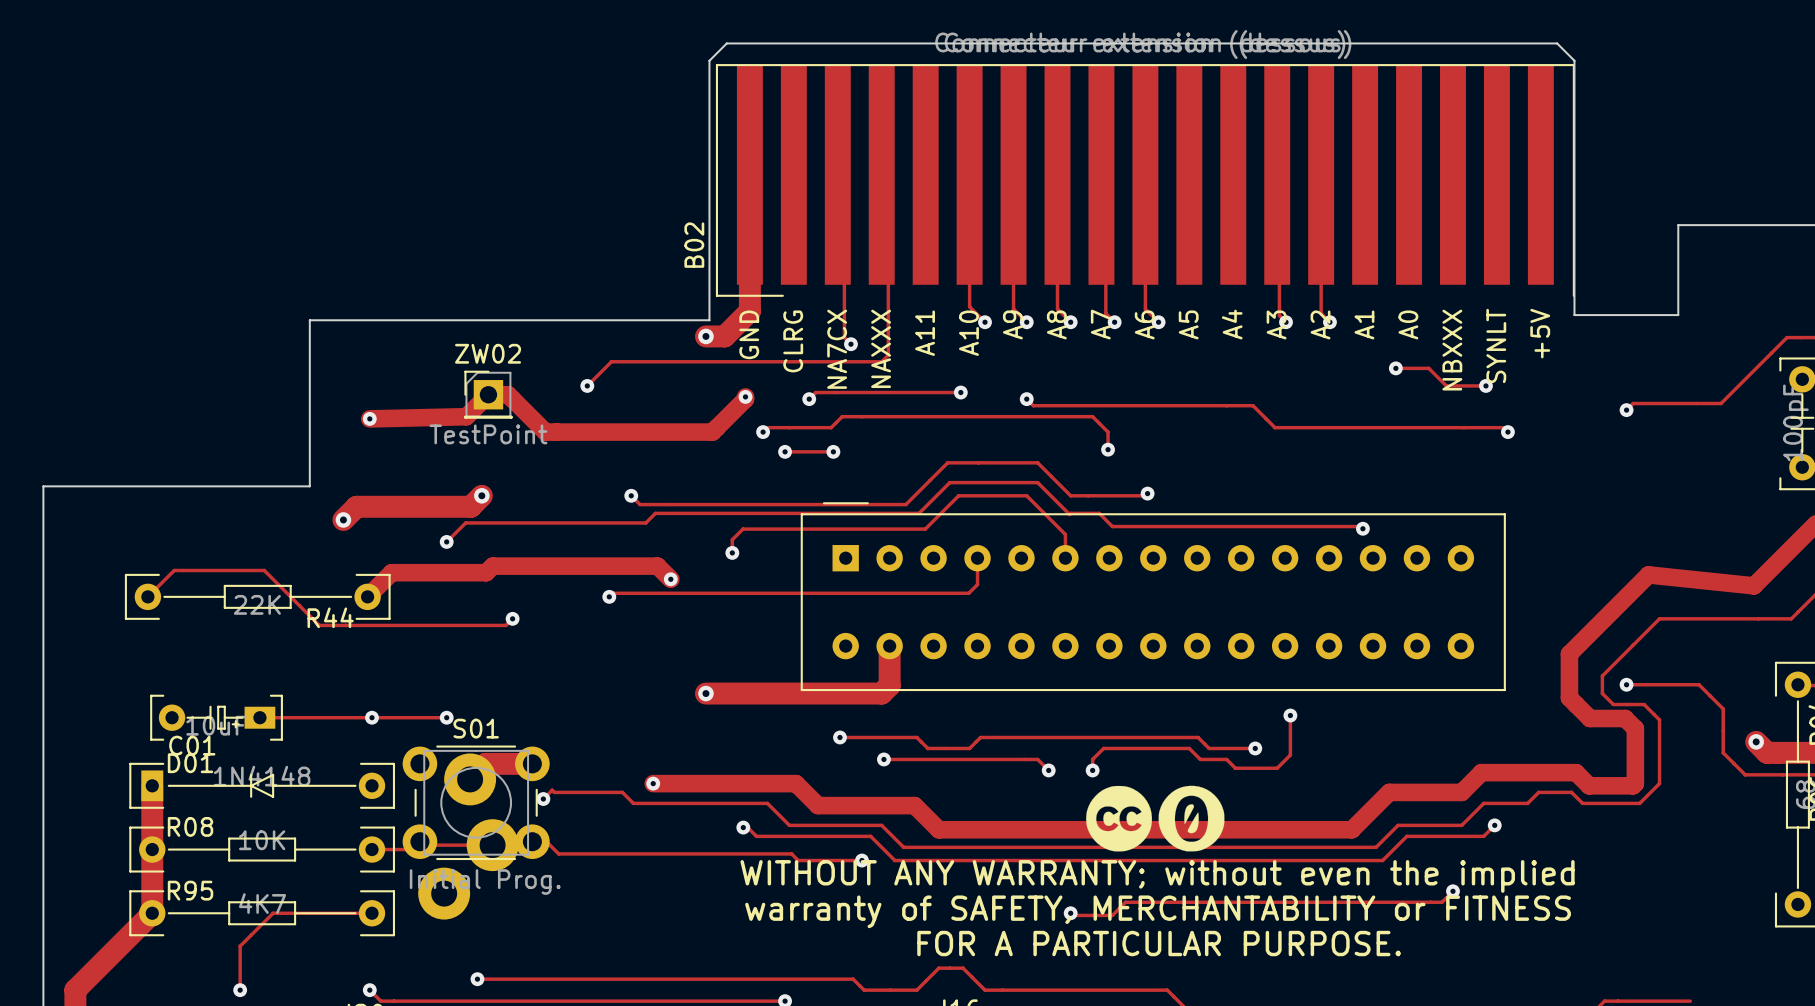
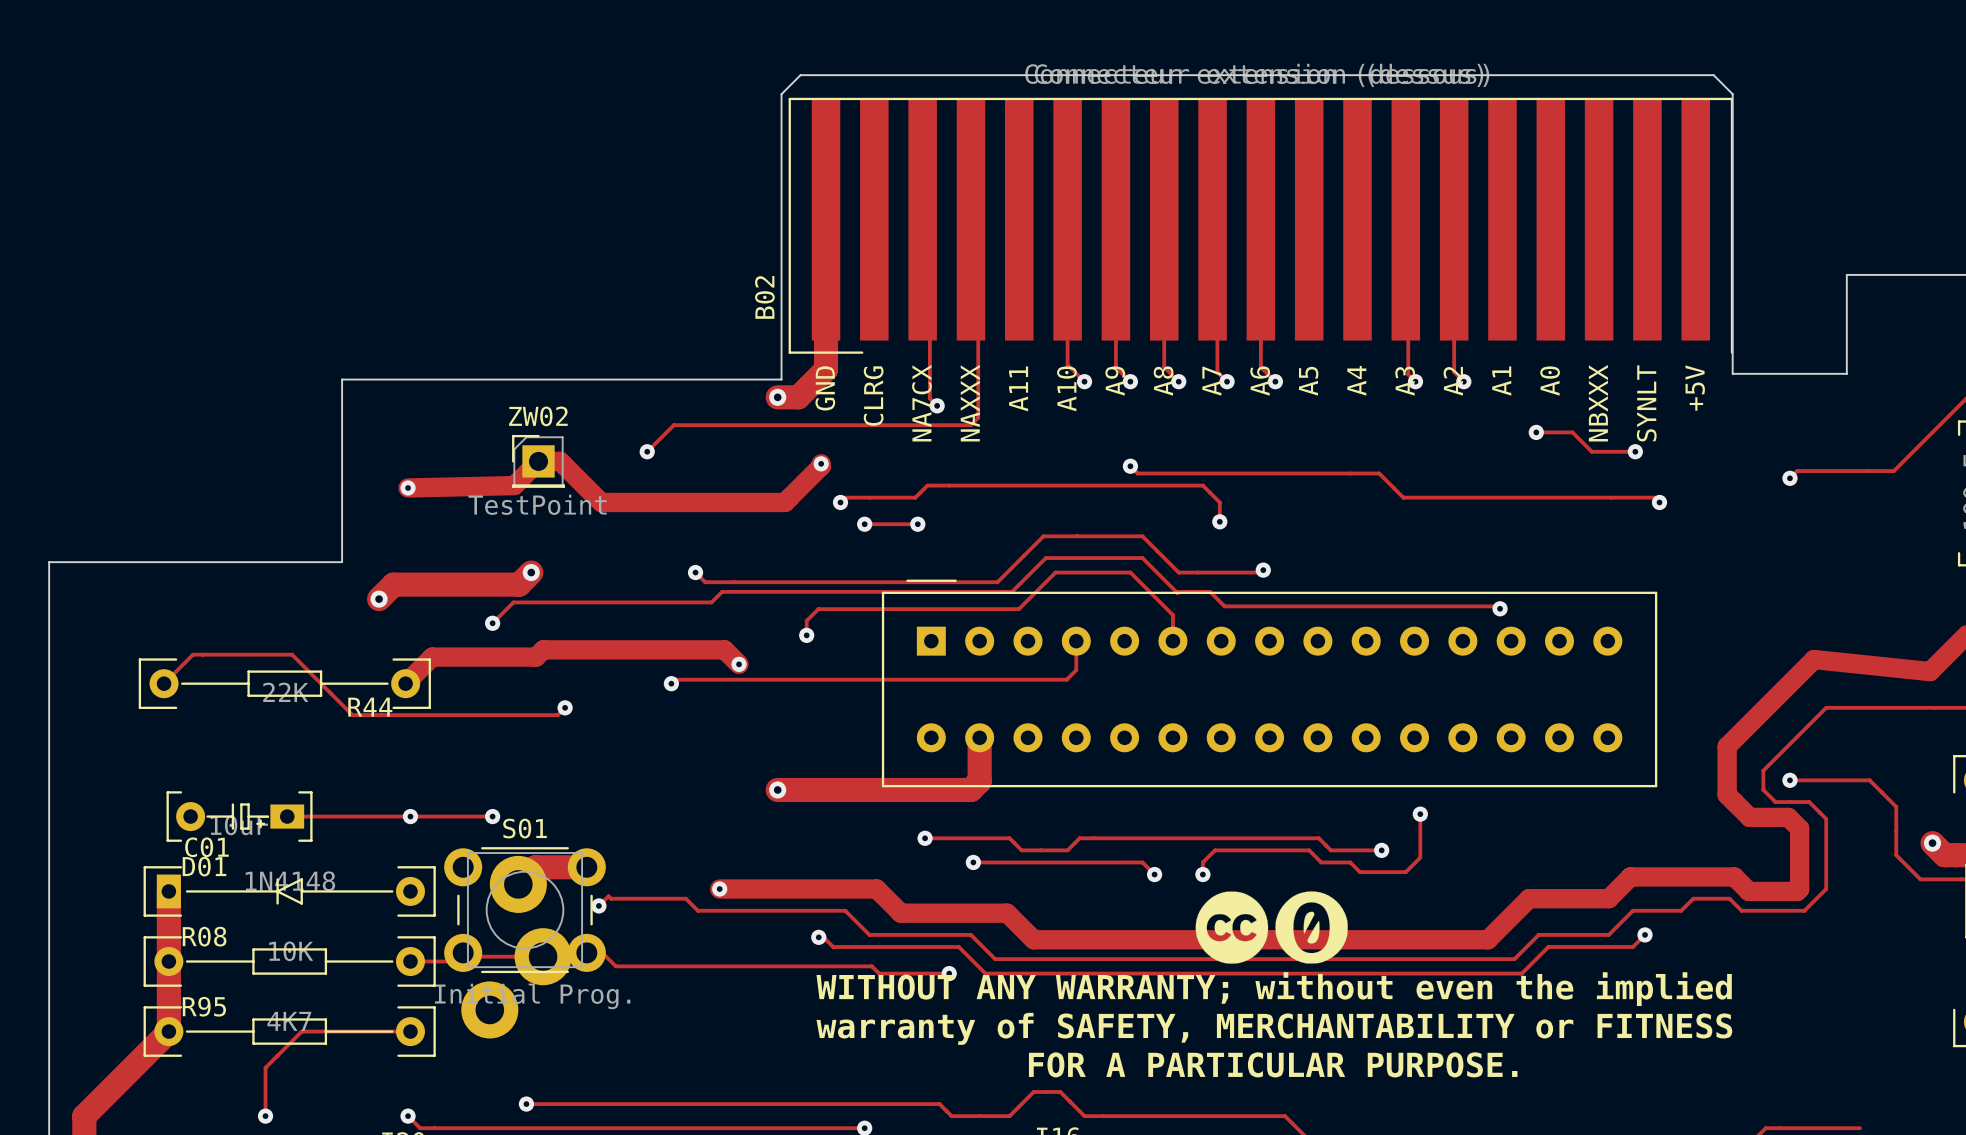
track: (960, 392) (815, 392) (809, 399) -> none
via: (960, 392) -> none
via: (809, 399) -> none
track: (1452, 891) (1442, 902) (1125, 902) (1112, 915) (1072, 915) (1070, 913) -> none
via: (1452, 891) -> none
via: (1070, 913) -> none

